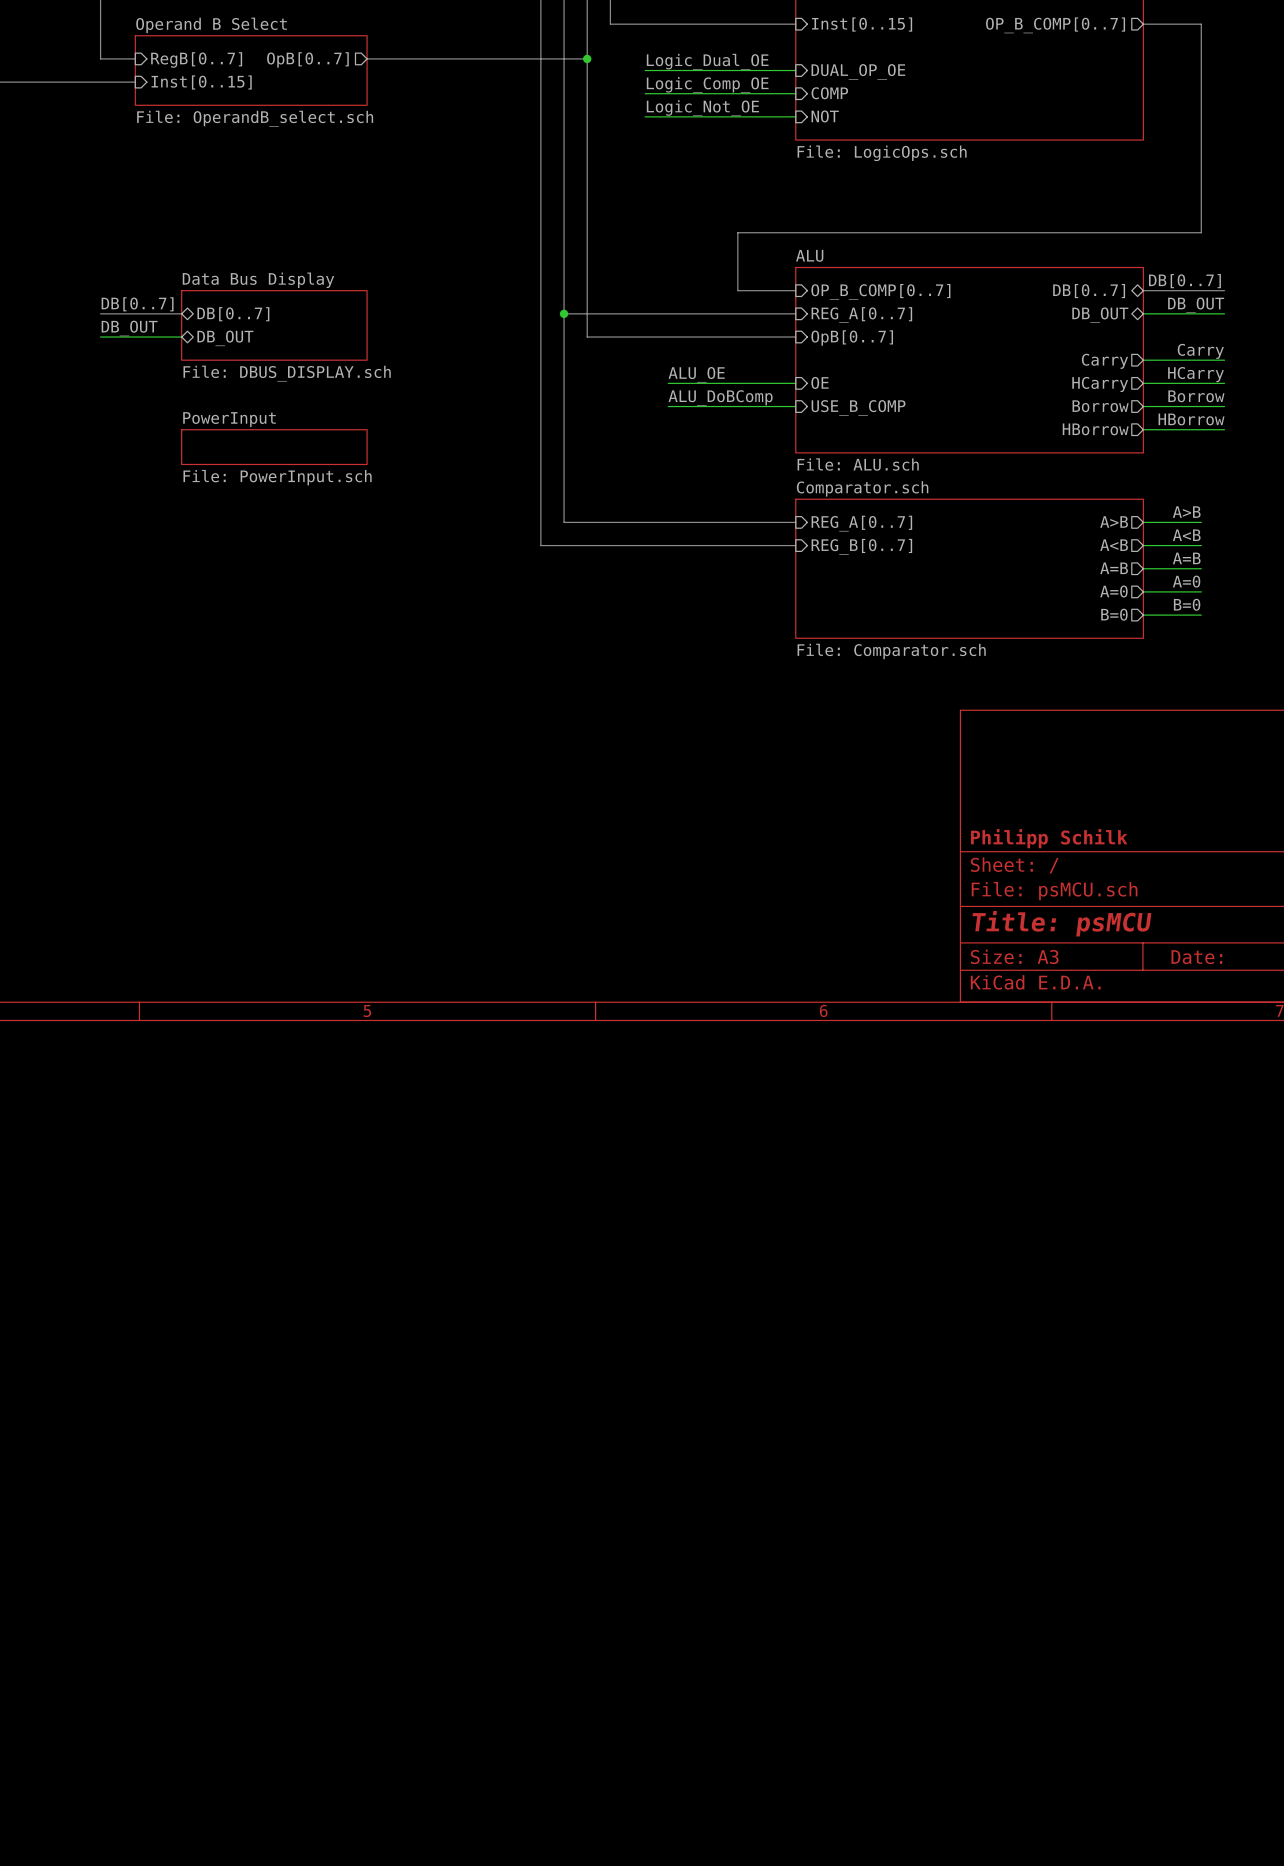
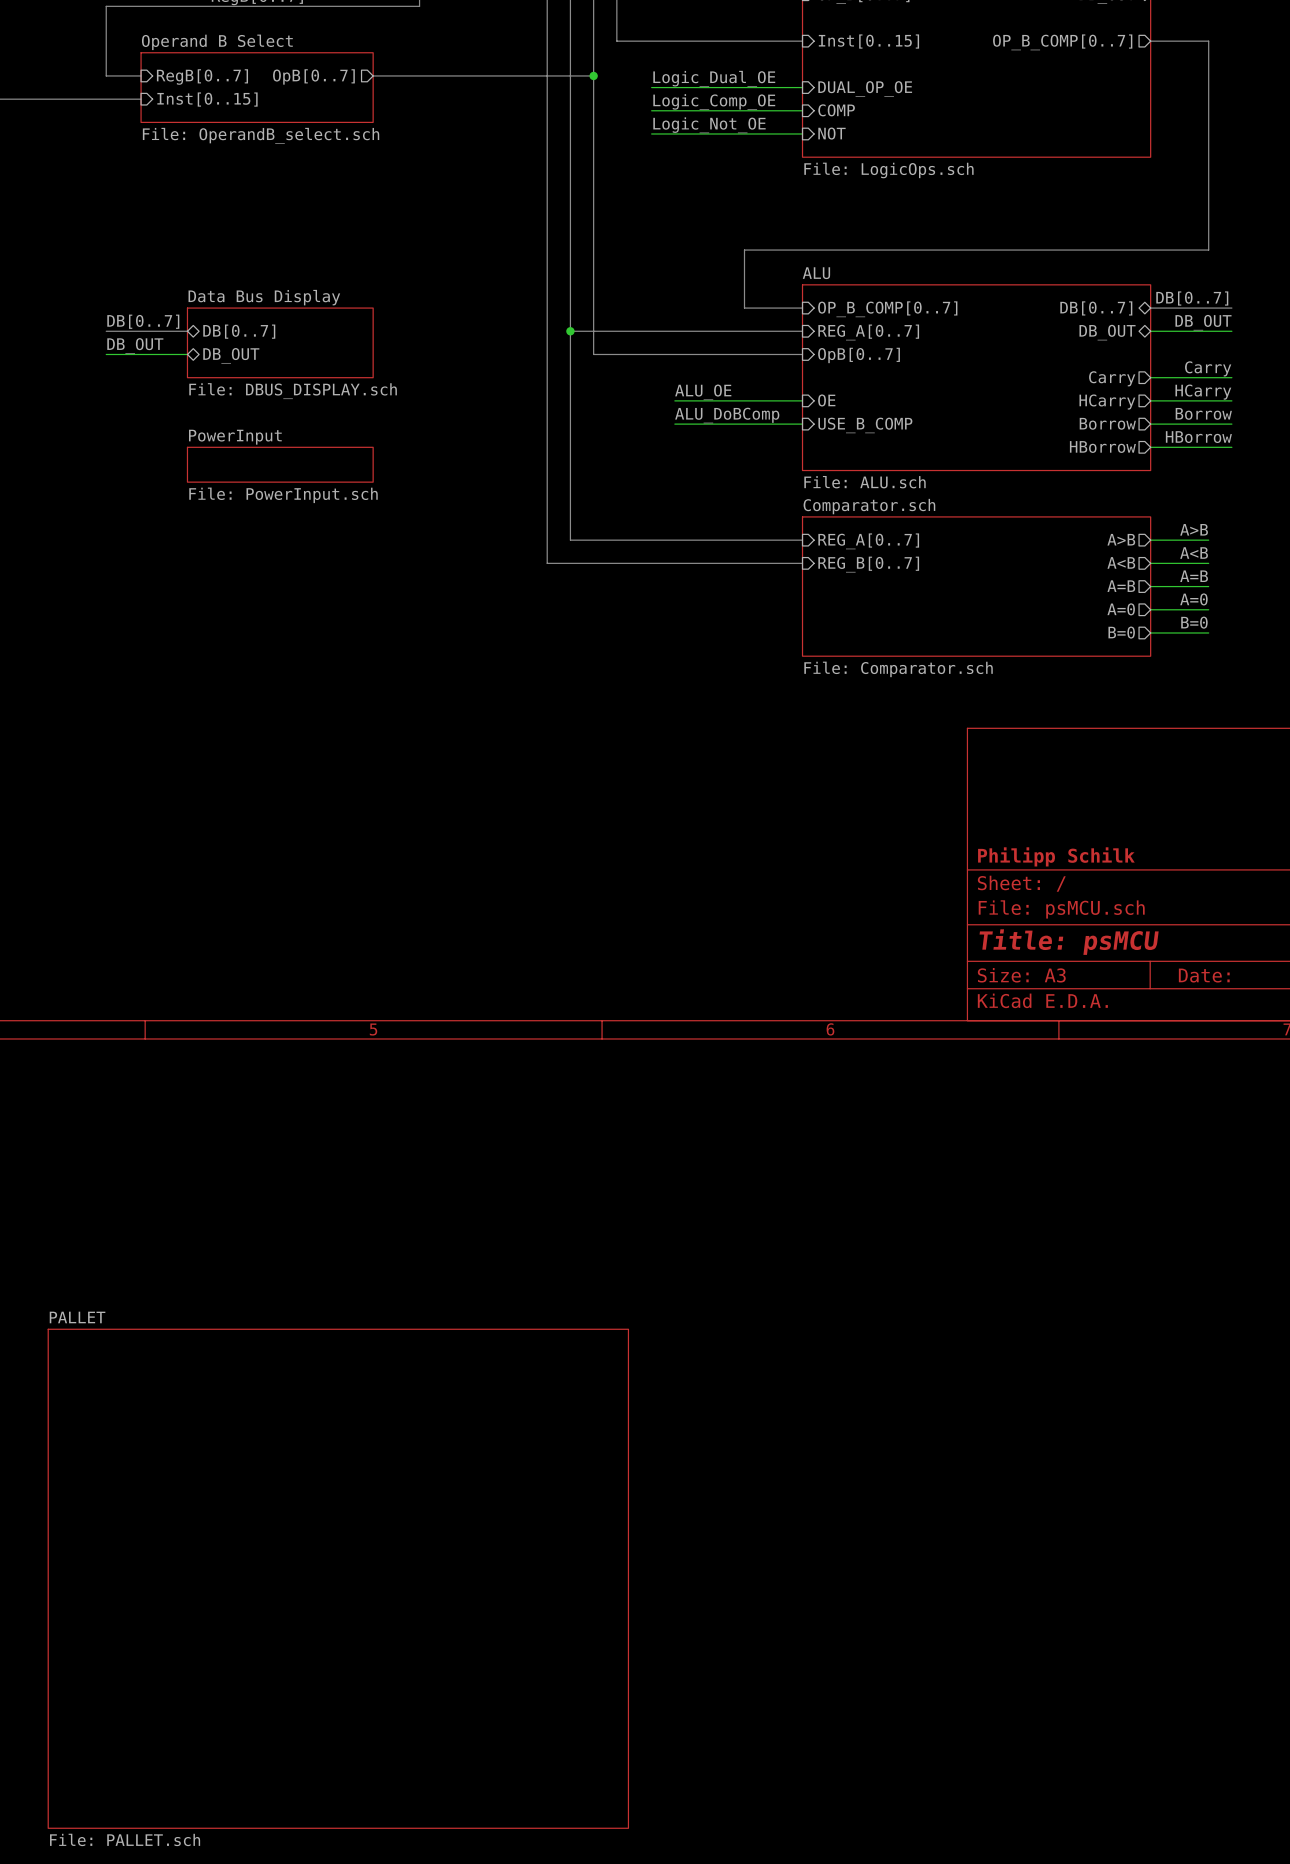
sheet PALLET: none -> File: PALLET.sch (338, 1578)

